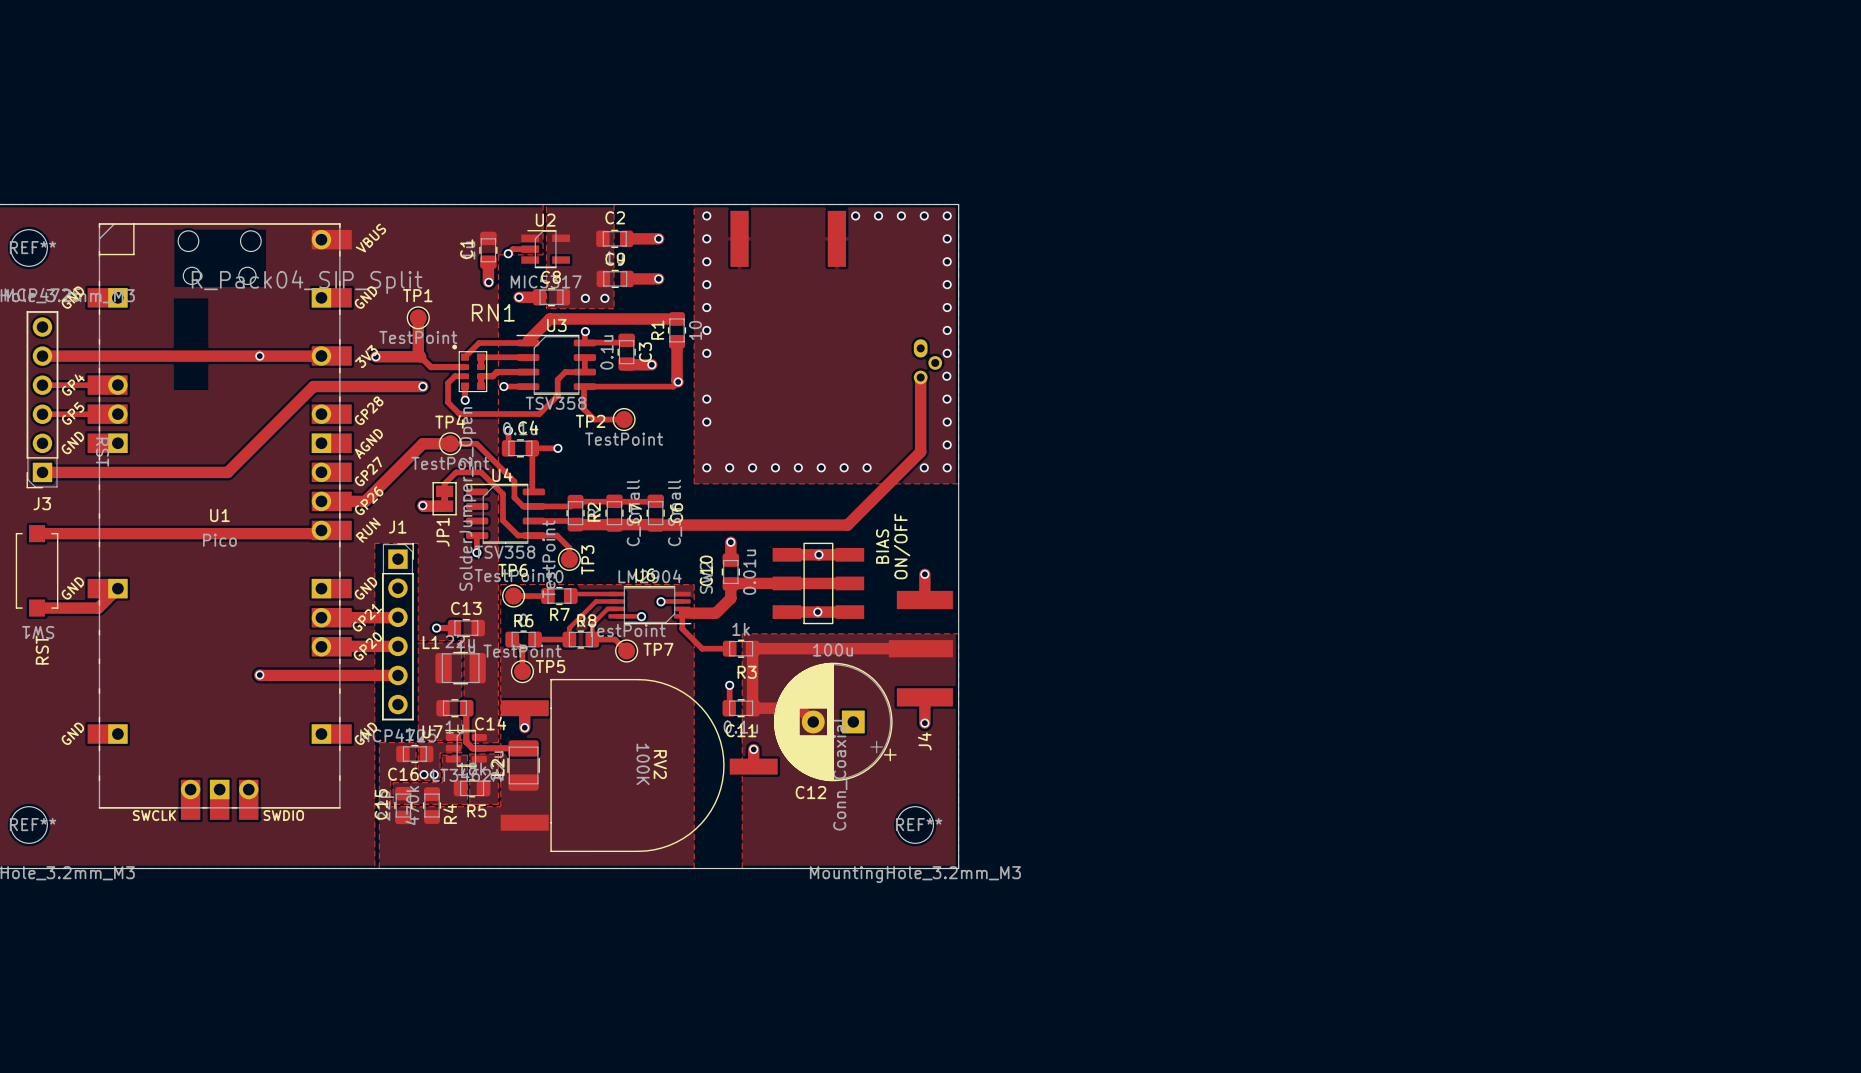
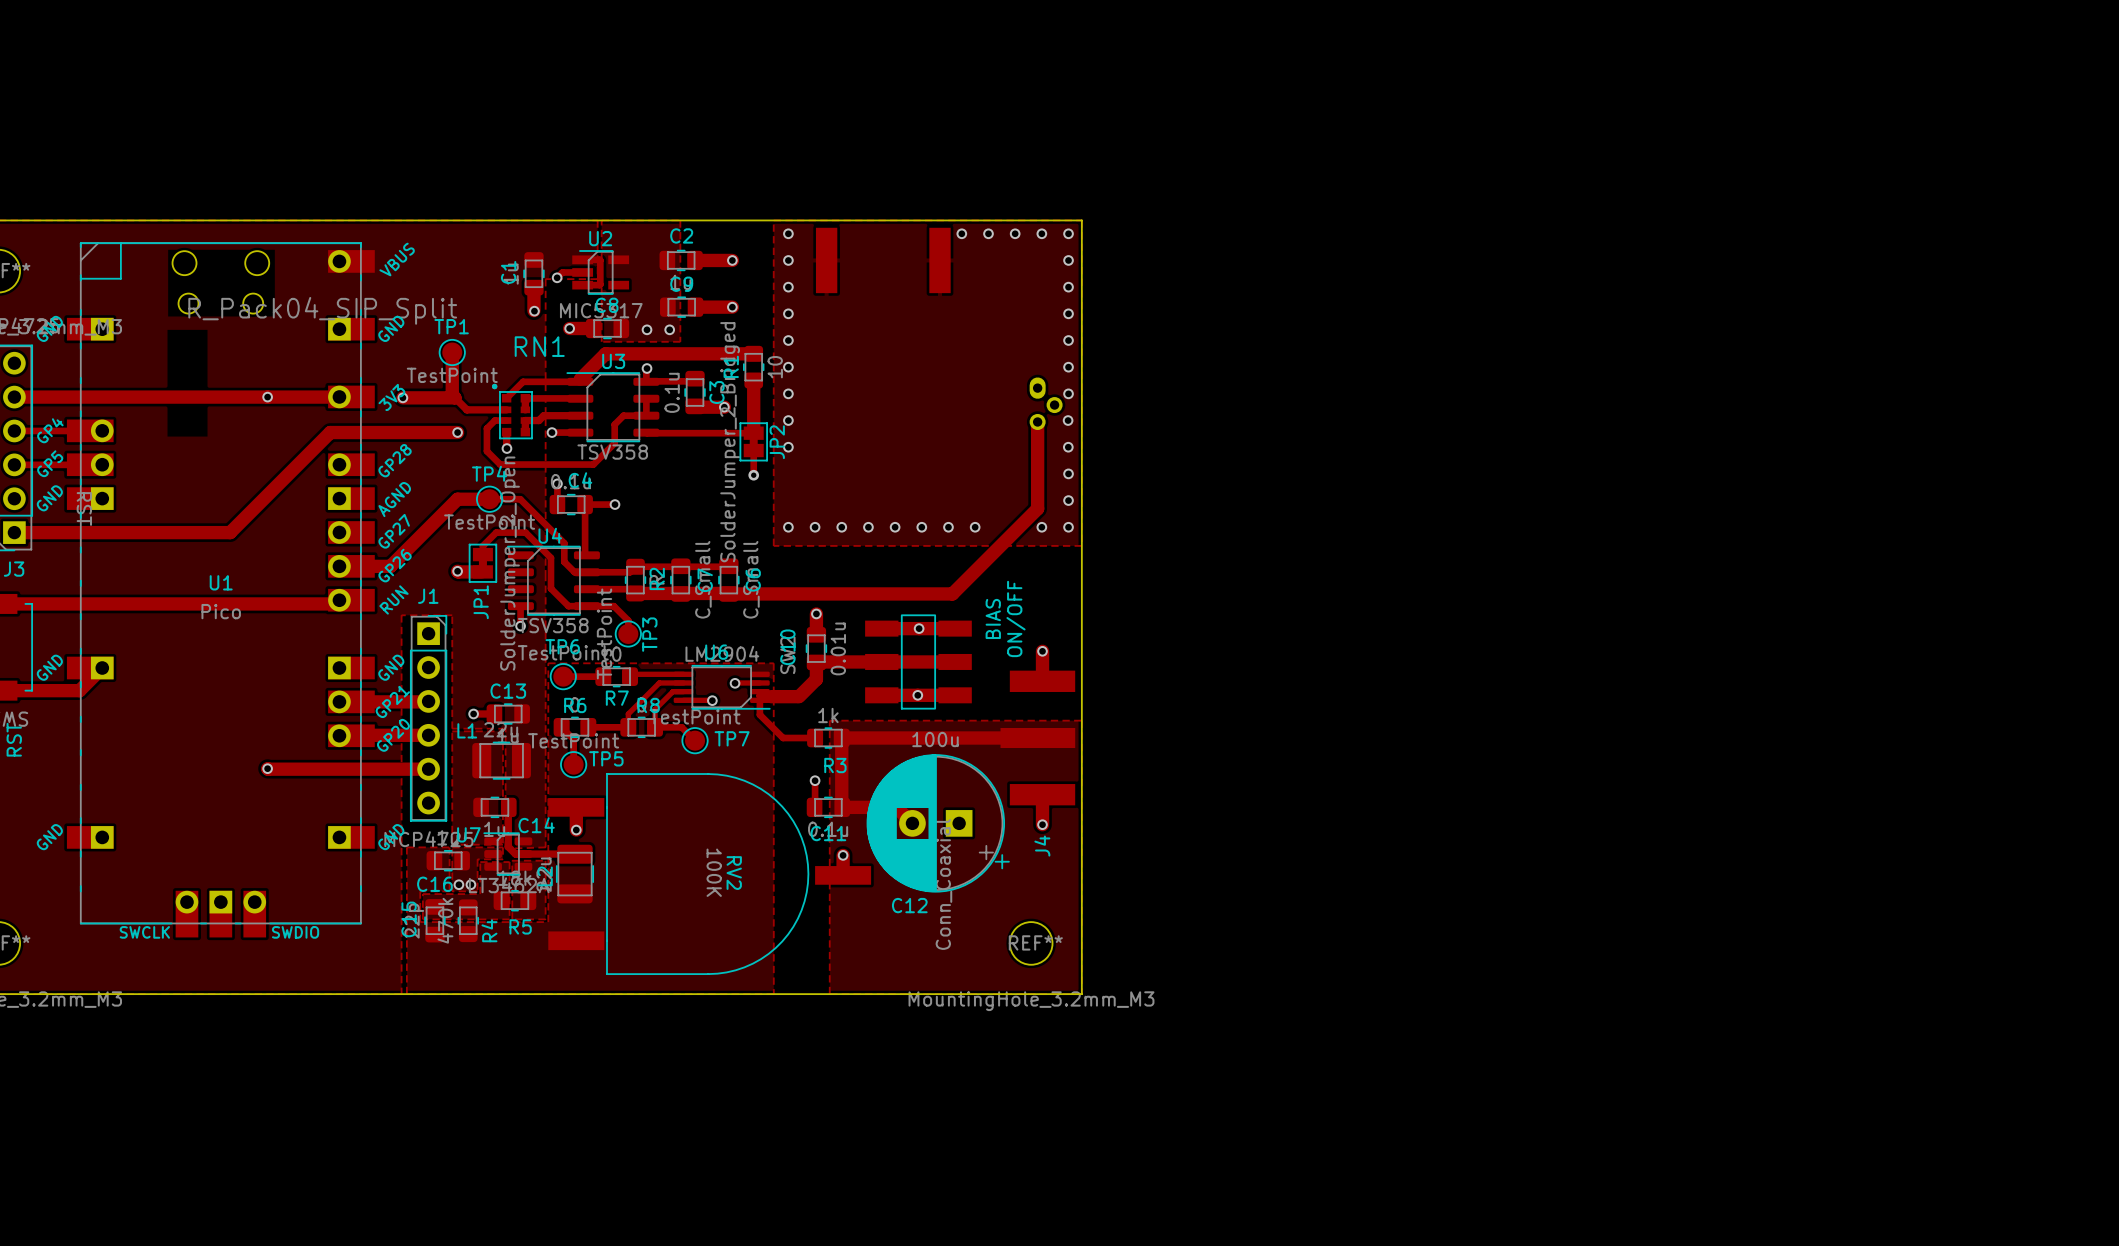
track: none -> (582, 259) (600, 260) (600, 284) (582, 285)
via: none -> (788, 420)
track: (677, 380) (678, 381) (673, 386) (584, 387) (584, 409) (594, 419) (624, 419) -> (753, 425) (753, 433) (646, 432)
via: (678, 381) -> none
JP2: none -> SolderJumper_2_Bridged (753, 441)
track: none -> (753, 450) (753, 475)
TP2: TestPoint (624, 419) -> none
via: (706, 422) -> none
via: none -> (753, 475)

